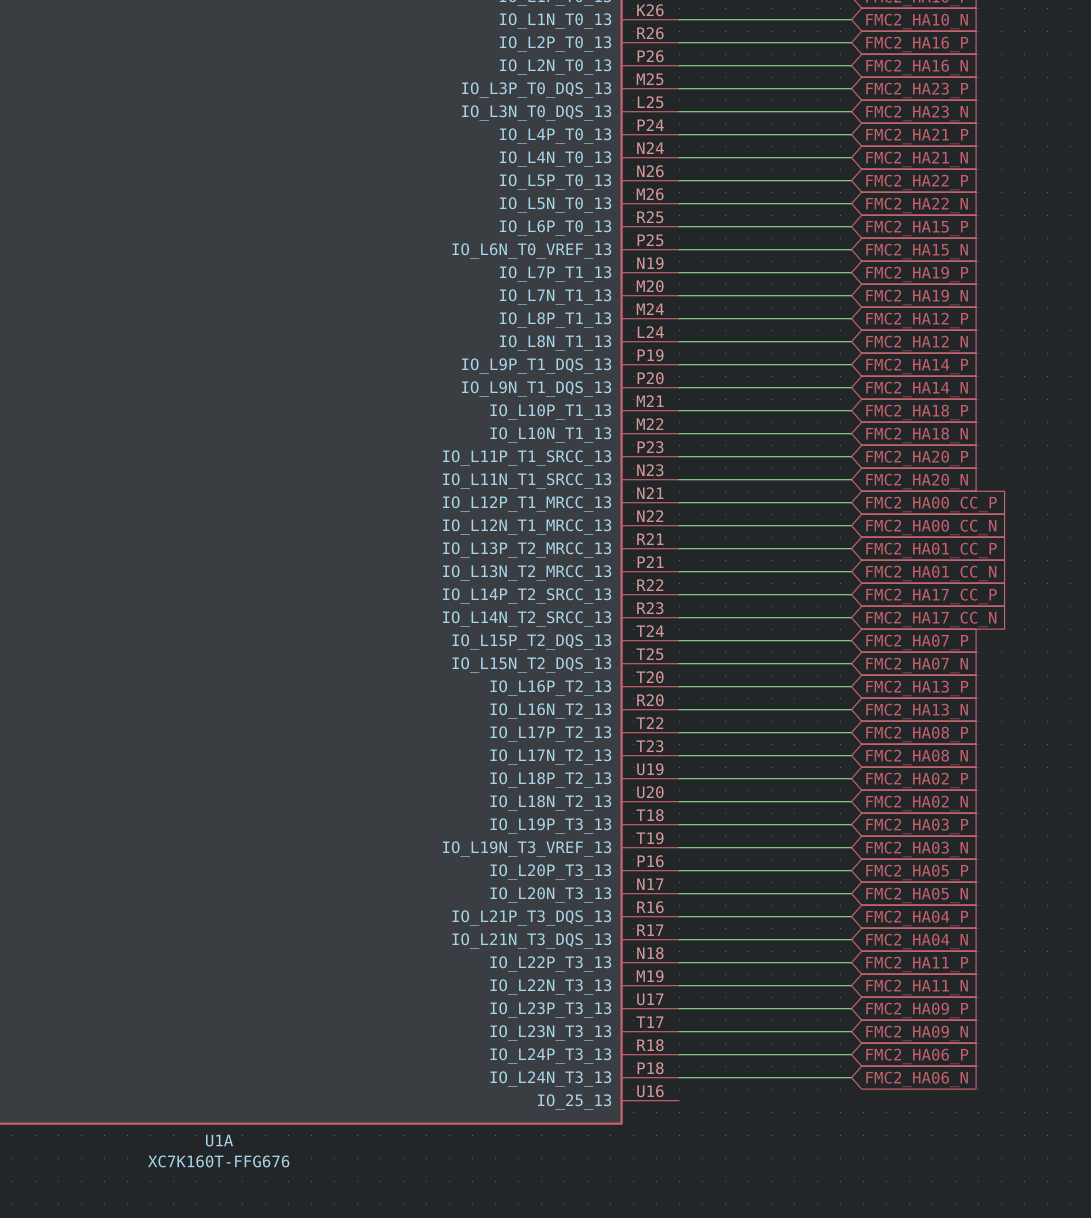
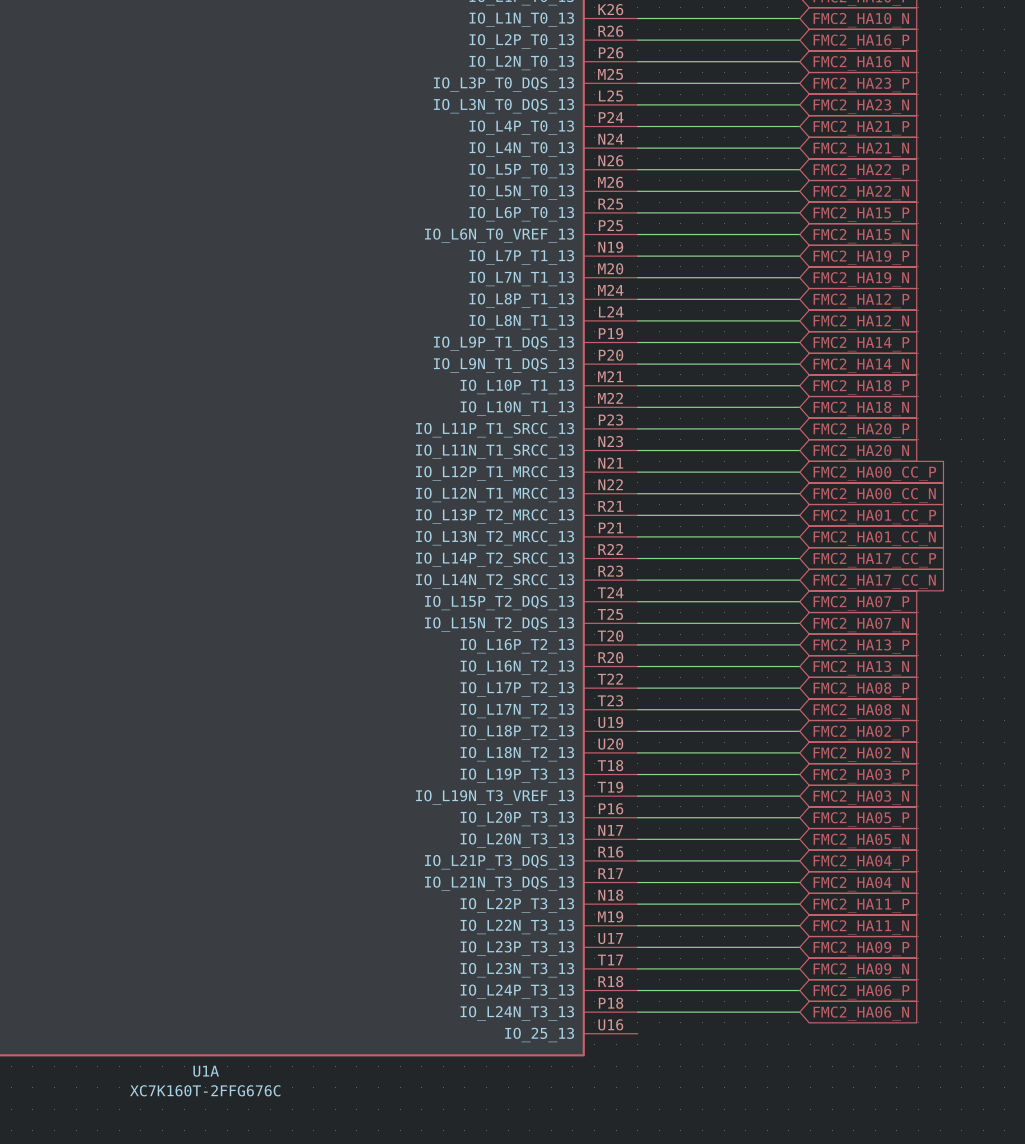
U1A value: XC7K160T-FFG676 (218, 1161) -> XC7K160T-2FFG676C (205, 1090)

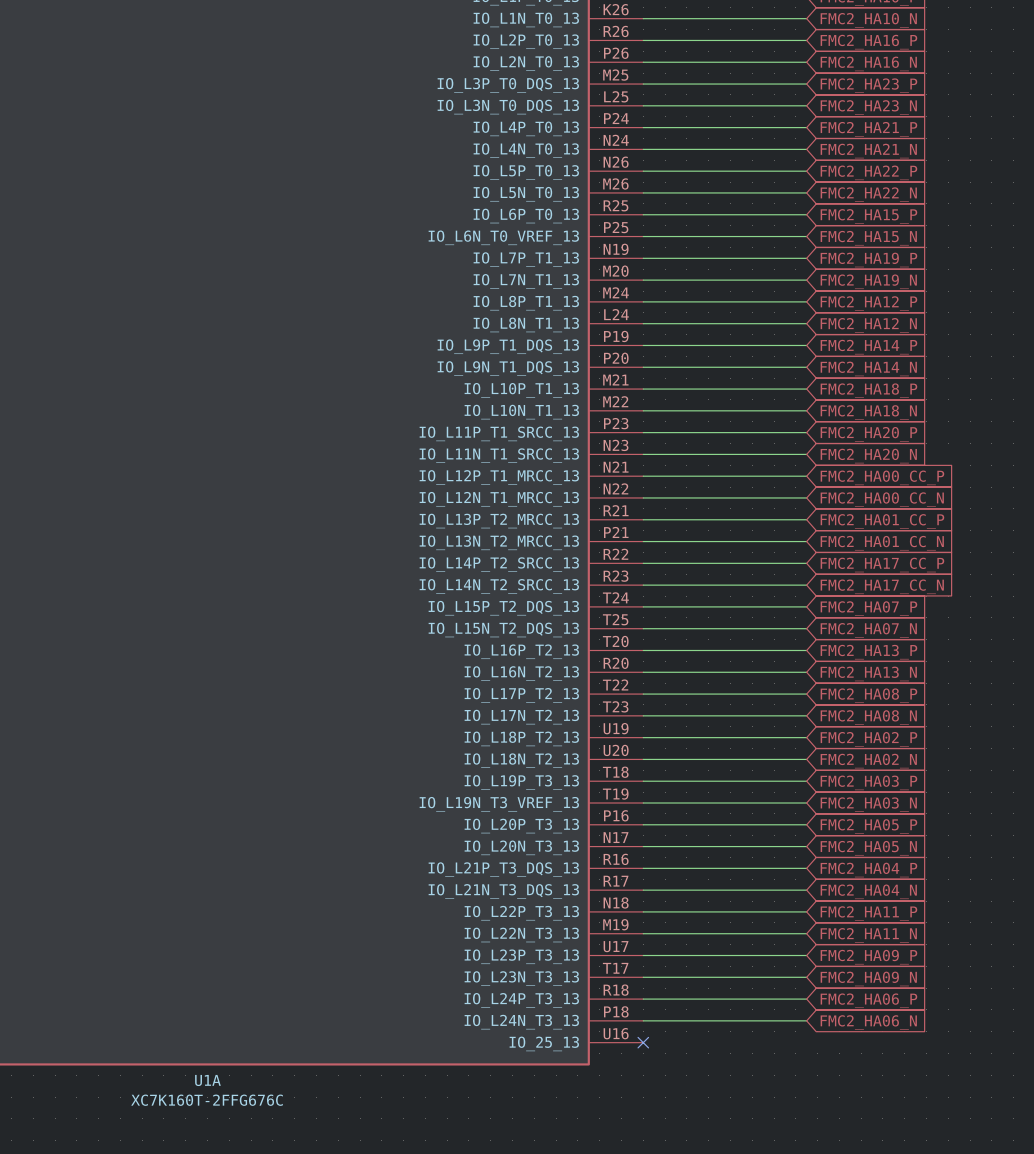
no-connect mark: none -> (643, 1042)

